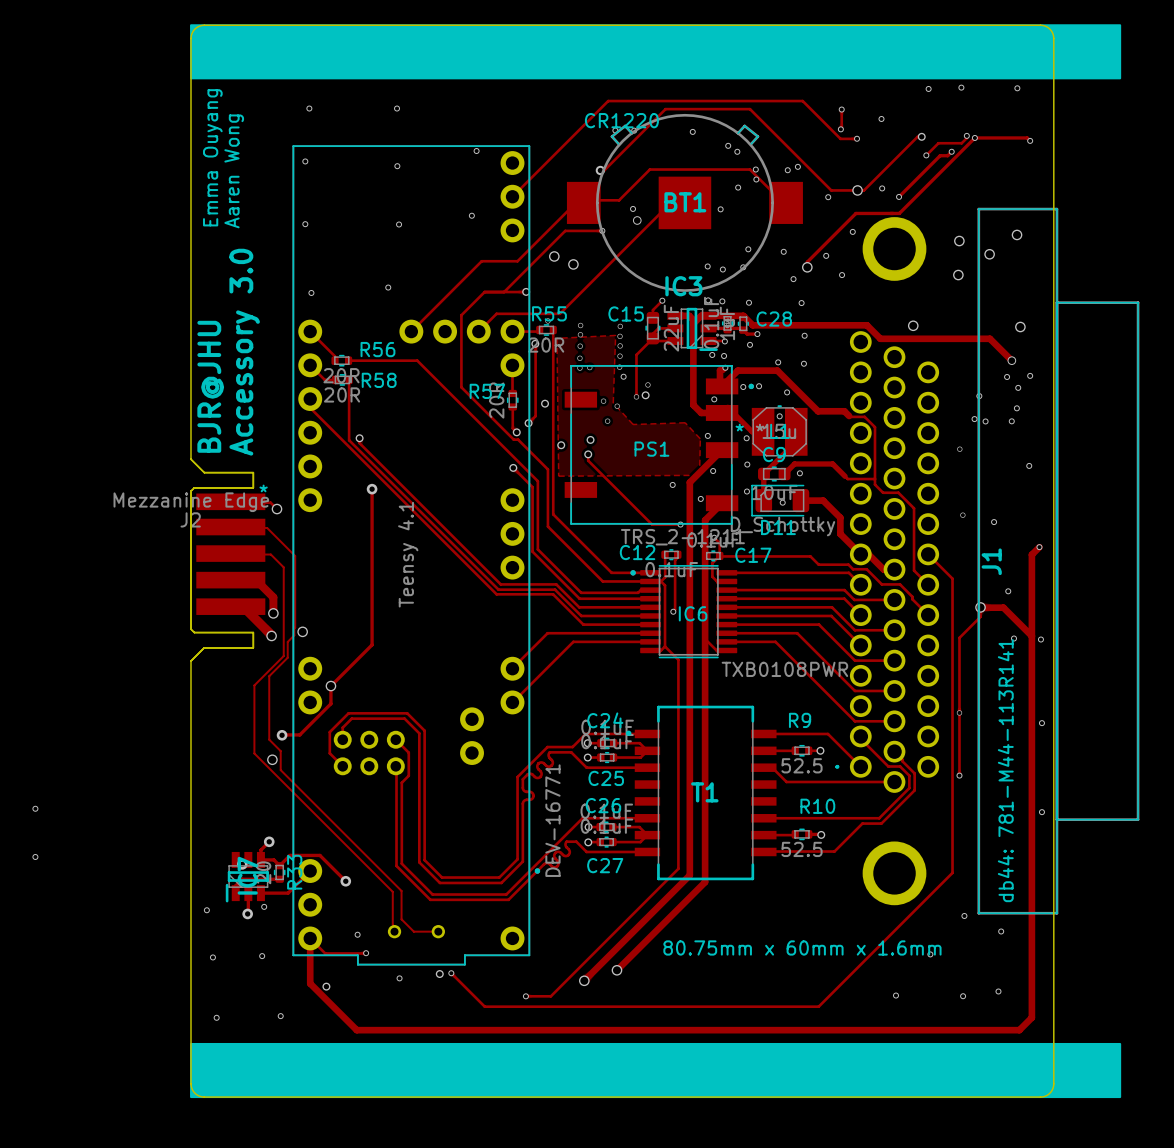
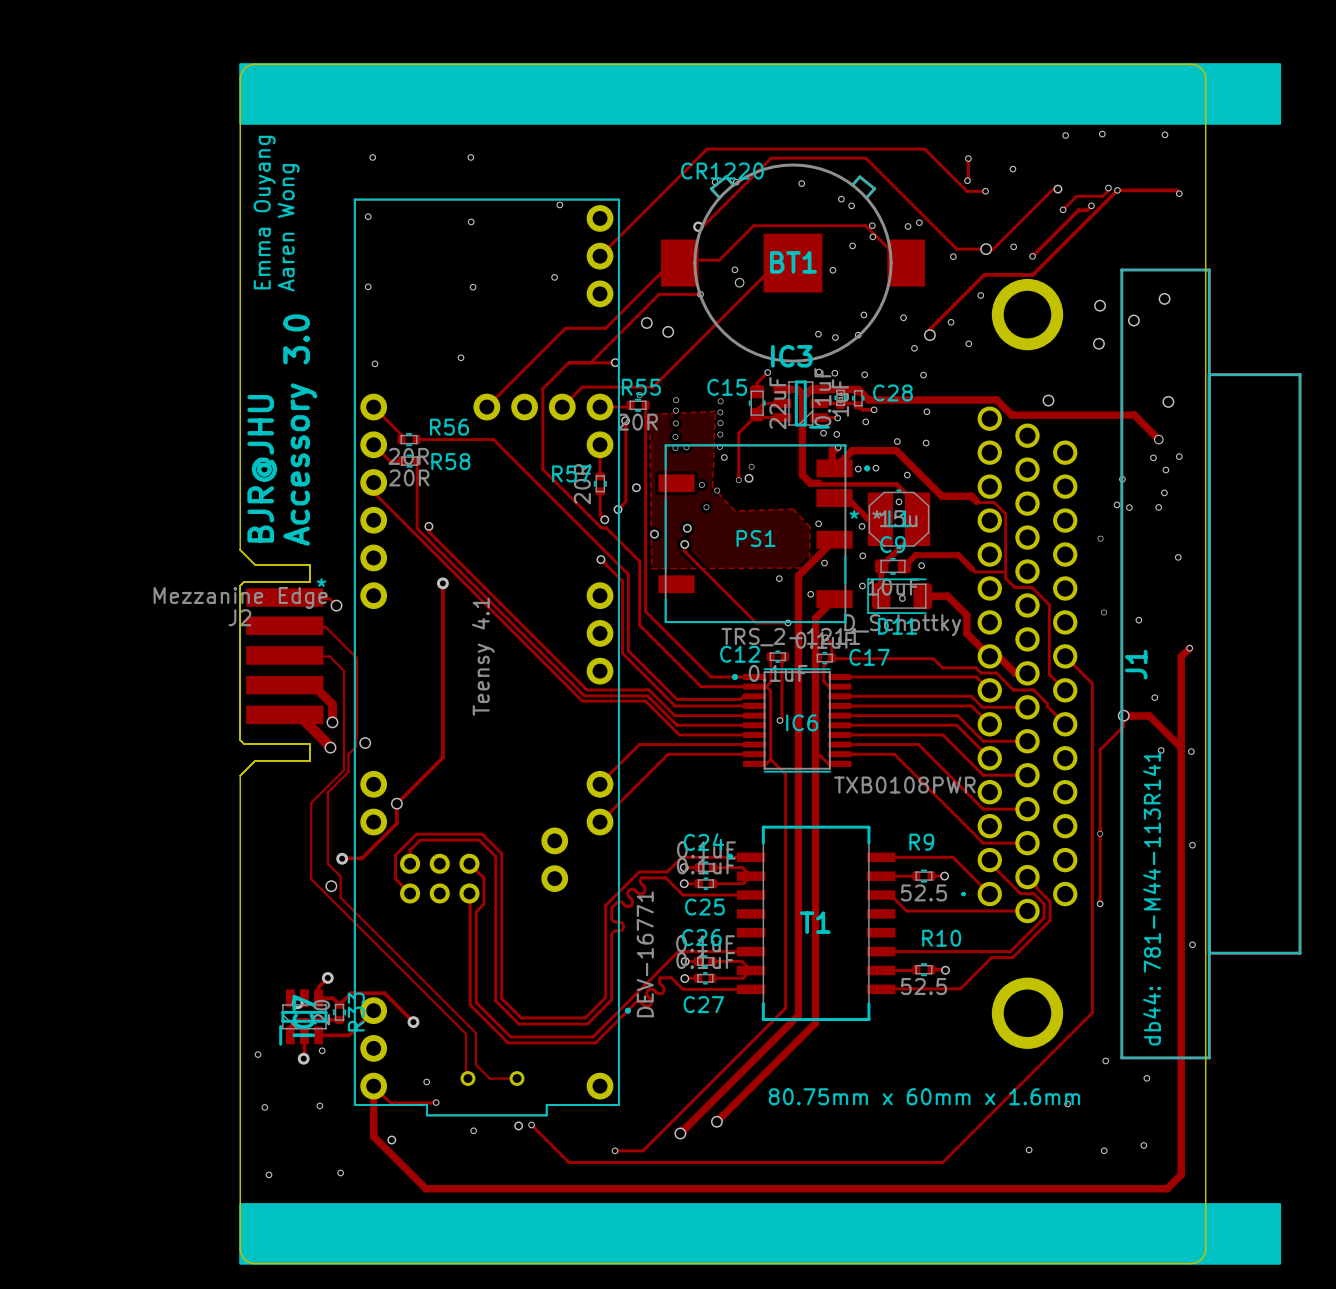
track: (693, 392) (693, 405) (701, 412) (722, 412) -> (802, 475) (810, 483) (820, 484) (896, 484) (917, 505) (917, 519) (917, 510)
via: (714, 399) -> none
via: (35, 808) -> none
via: (35, 856) -> none

